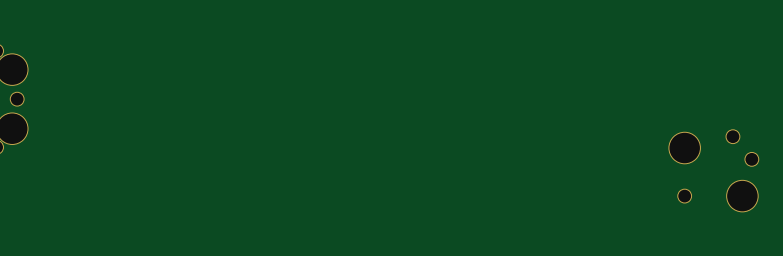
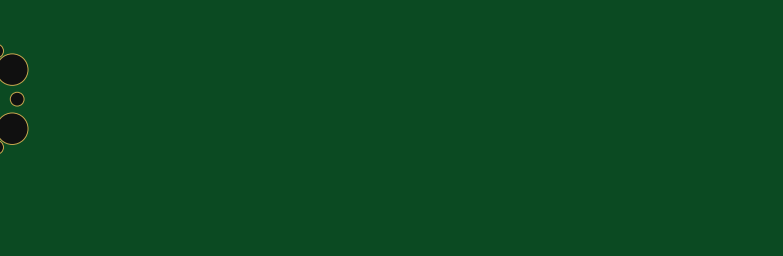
via: (732, 136) -> none
via: (684, 148) -> none
via: (751, 159) -> none
via: (684, 196) -> none
via: (742, 196) -> none

